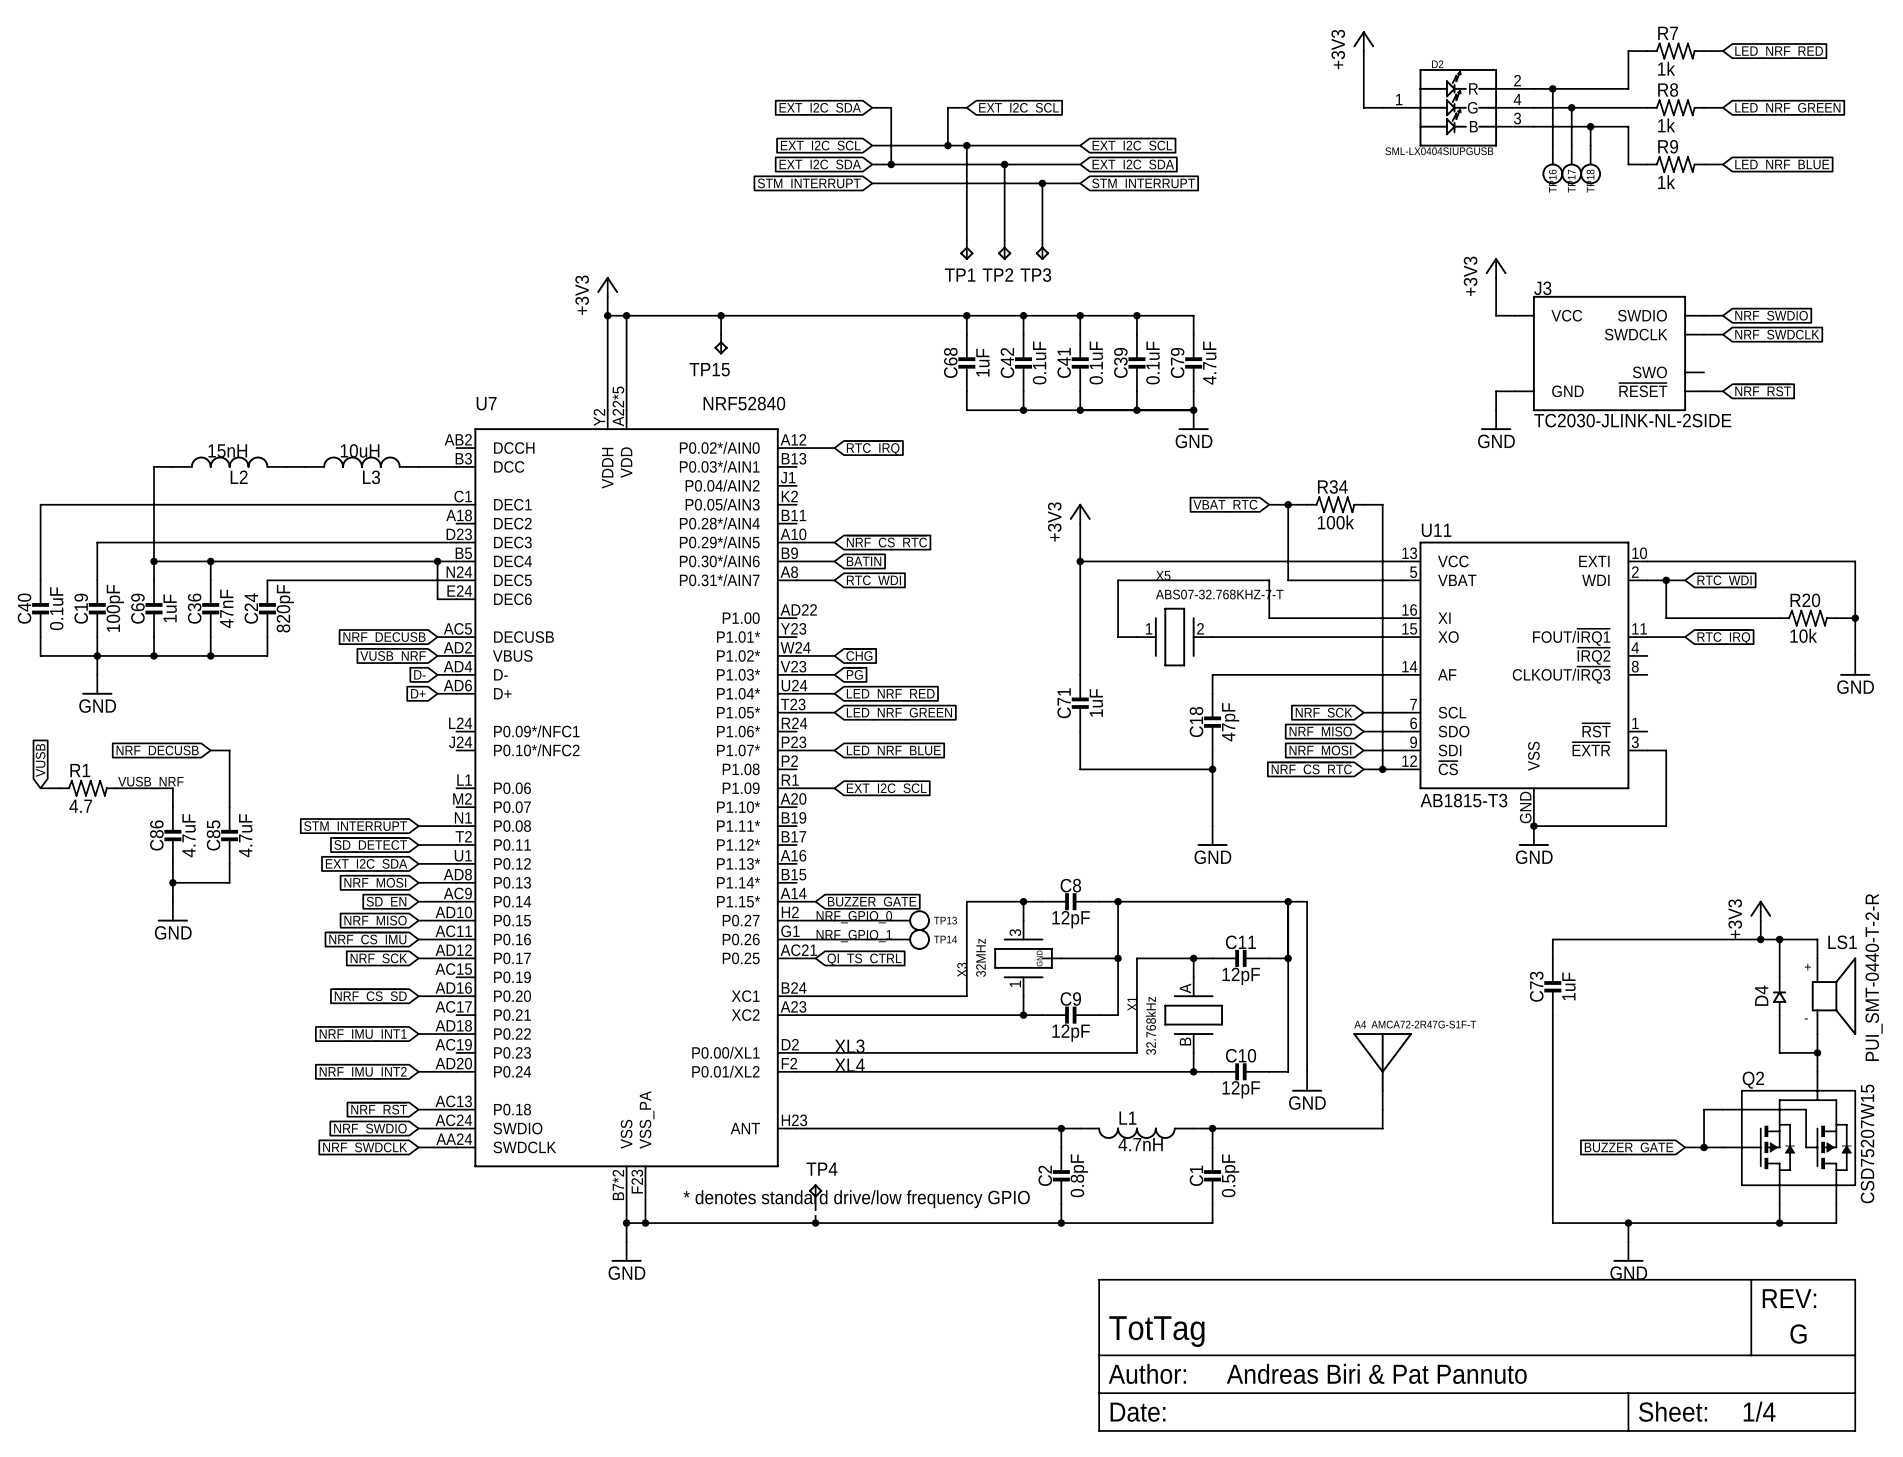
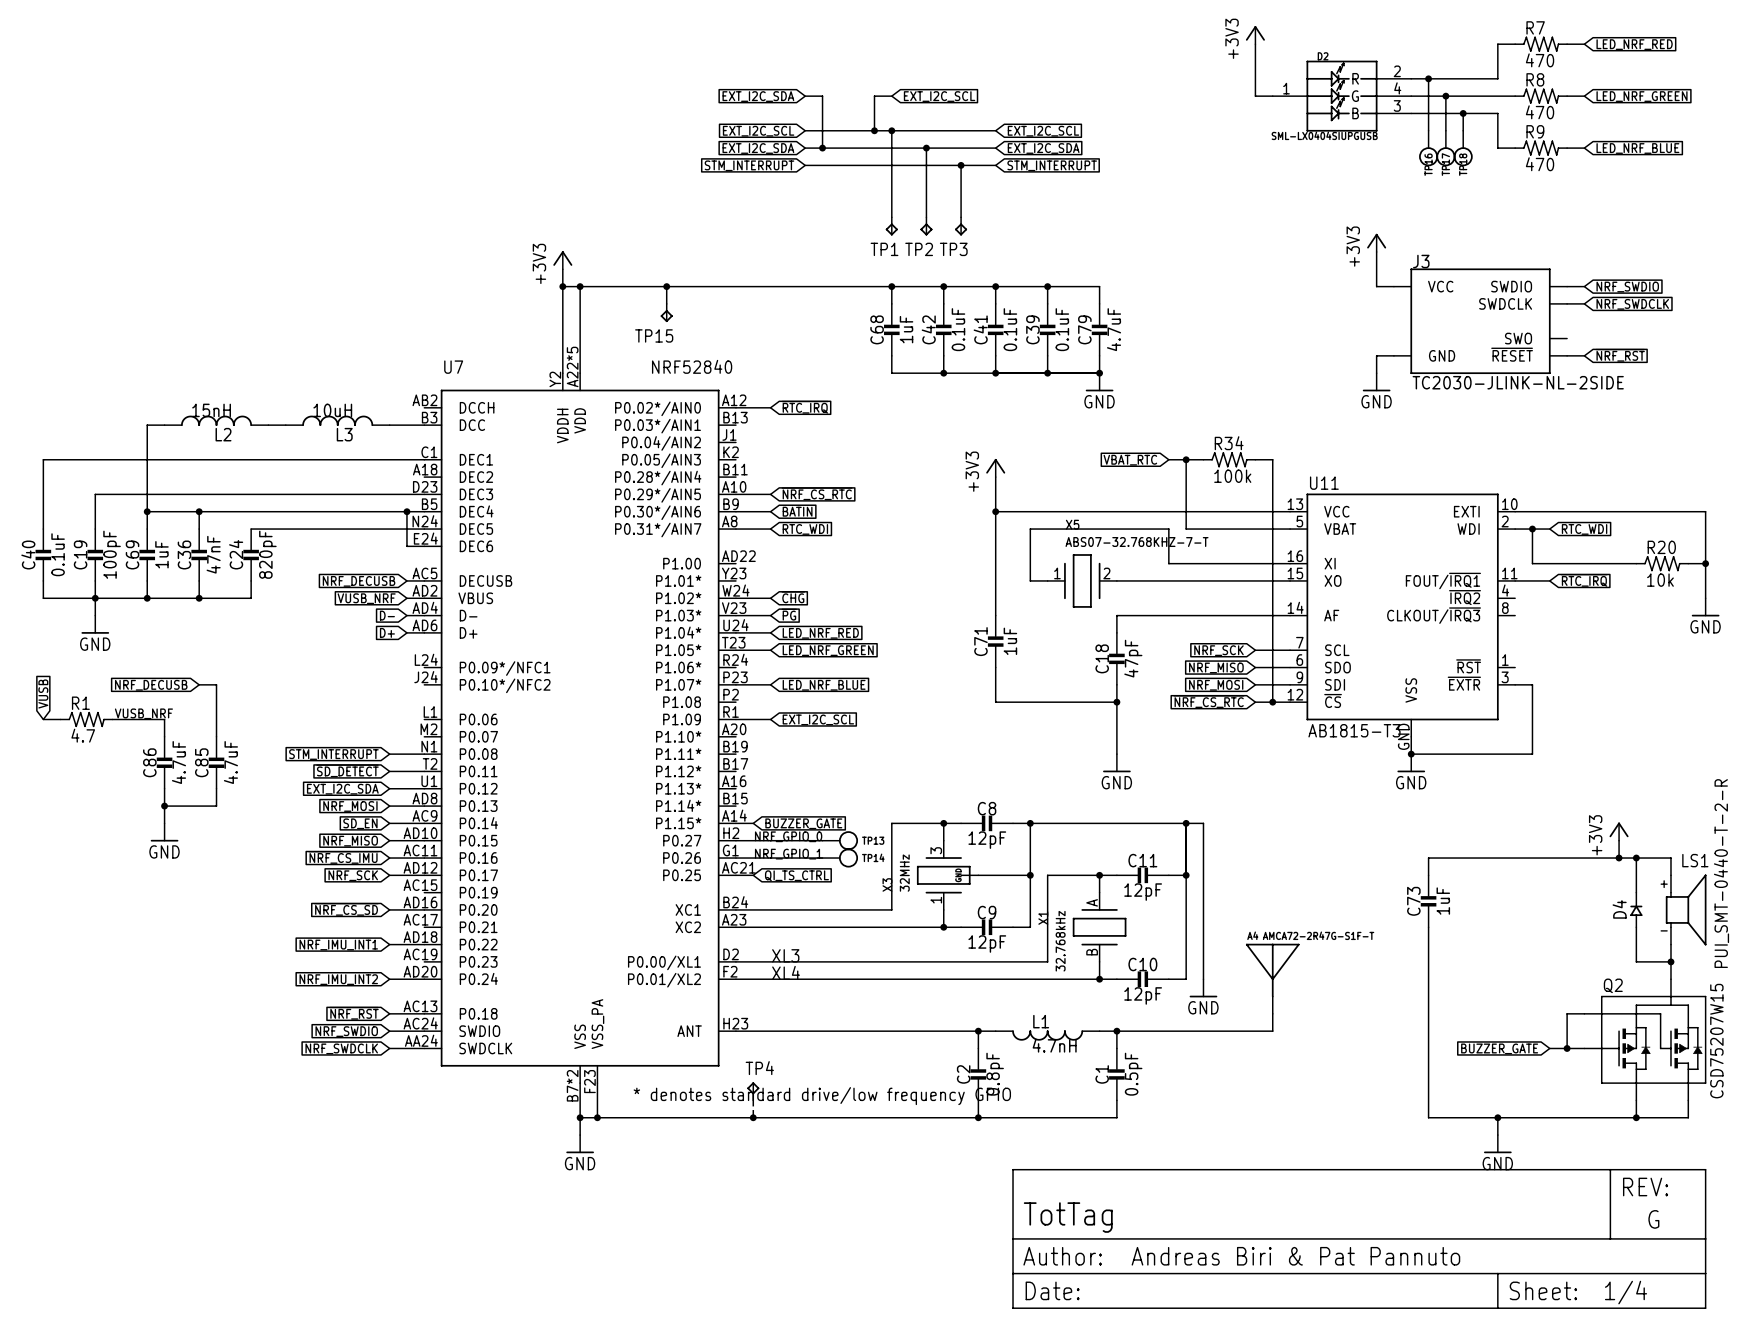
R7 value: 1k (1666, 68) -> 470 (1540, 60)
R8 value: 1k (1666, 125) -> 470 (1540, 112)
R9 value: 1k (1666, 182) -> 470 (1540, 164)

